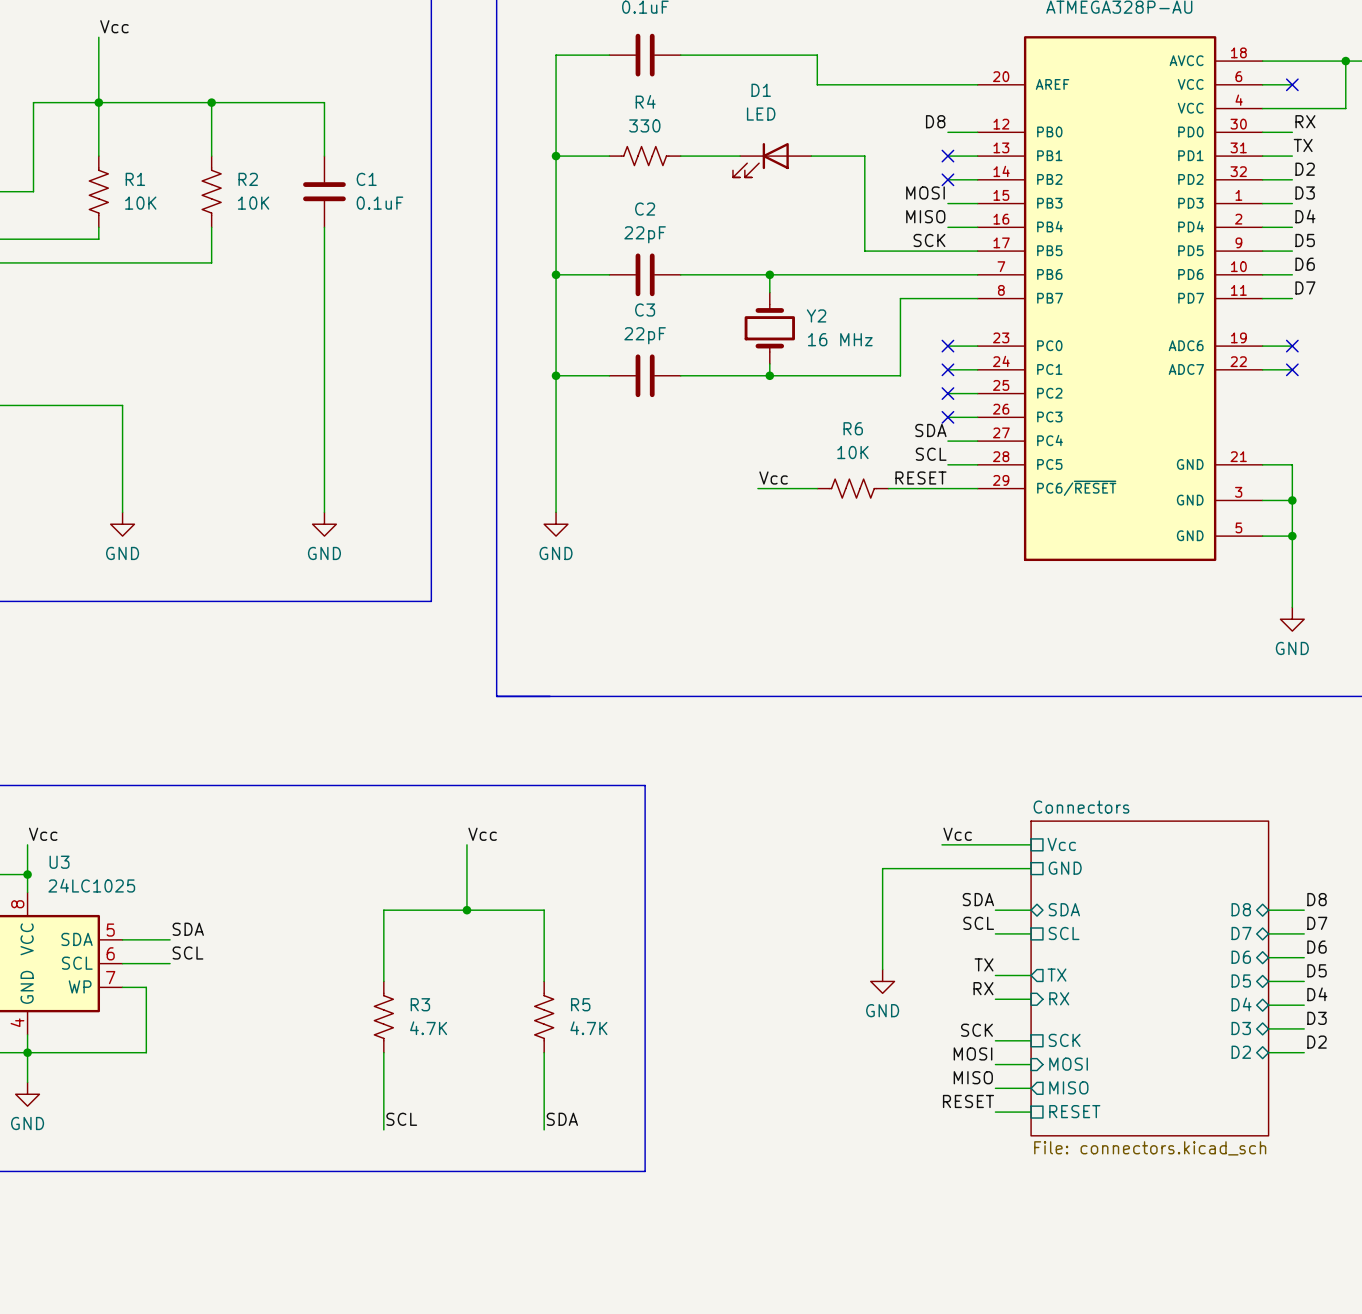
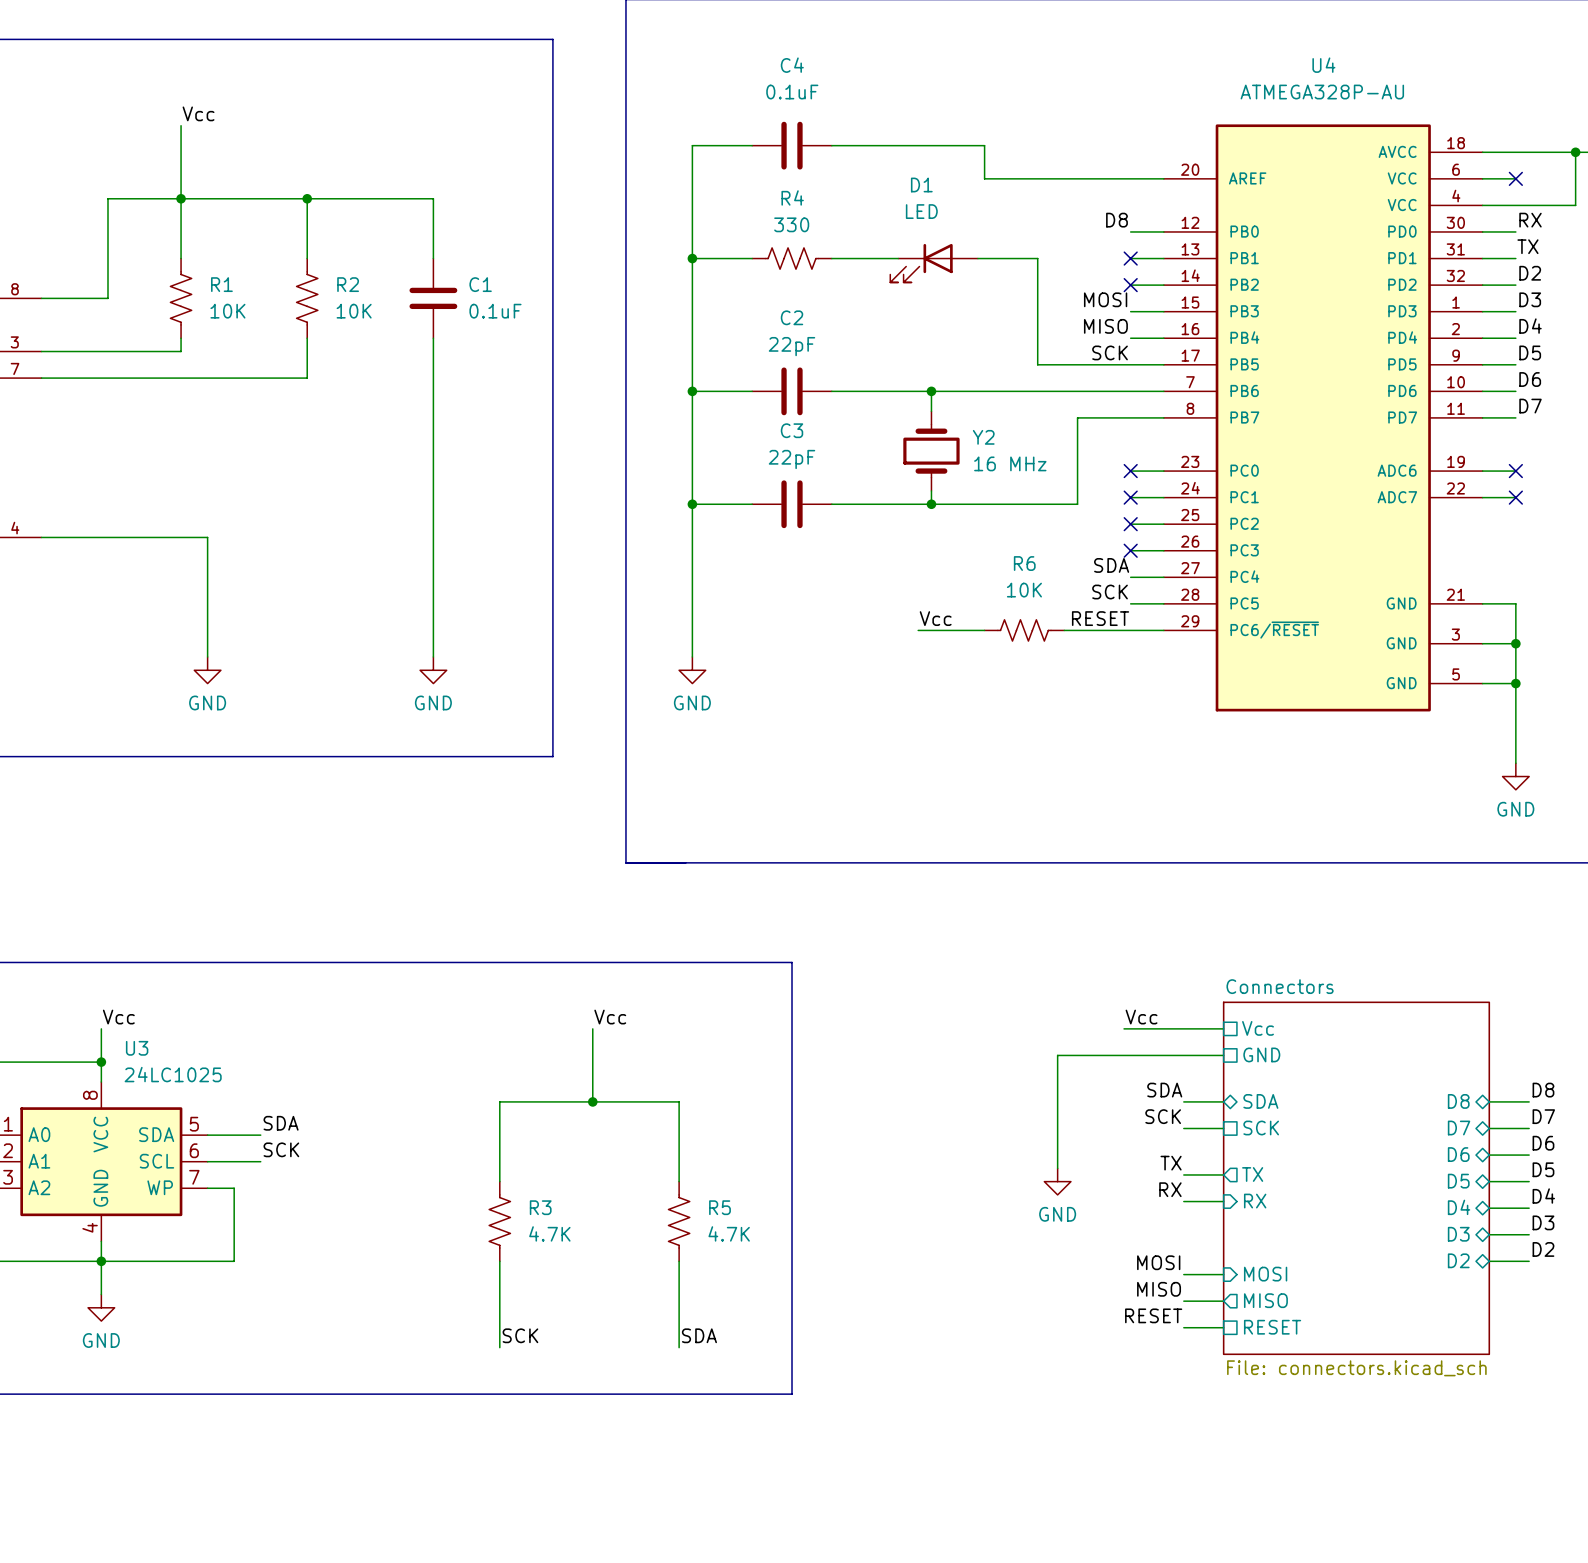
label: SCL (931, 454) -> SCK (1110, 592)
label: SCL (978, 923) -> SCK (1163, 1116)
sheet pin: SCL (1064, 933) -> SCK (1261, 1128)
label: SCL (187, 953) -> SCK (281, 1149)
label: SCK (976, 1030) -> none
wire: (995, 1040) (1031, 1040) -> none
sheet pin: SCK (1064, 1040) -> none
label: SCL (401, 1119) -> SCK (520, 1335)

